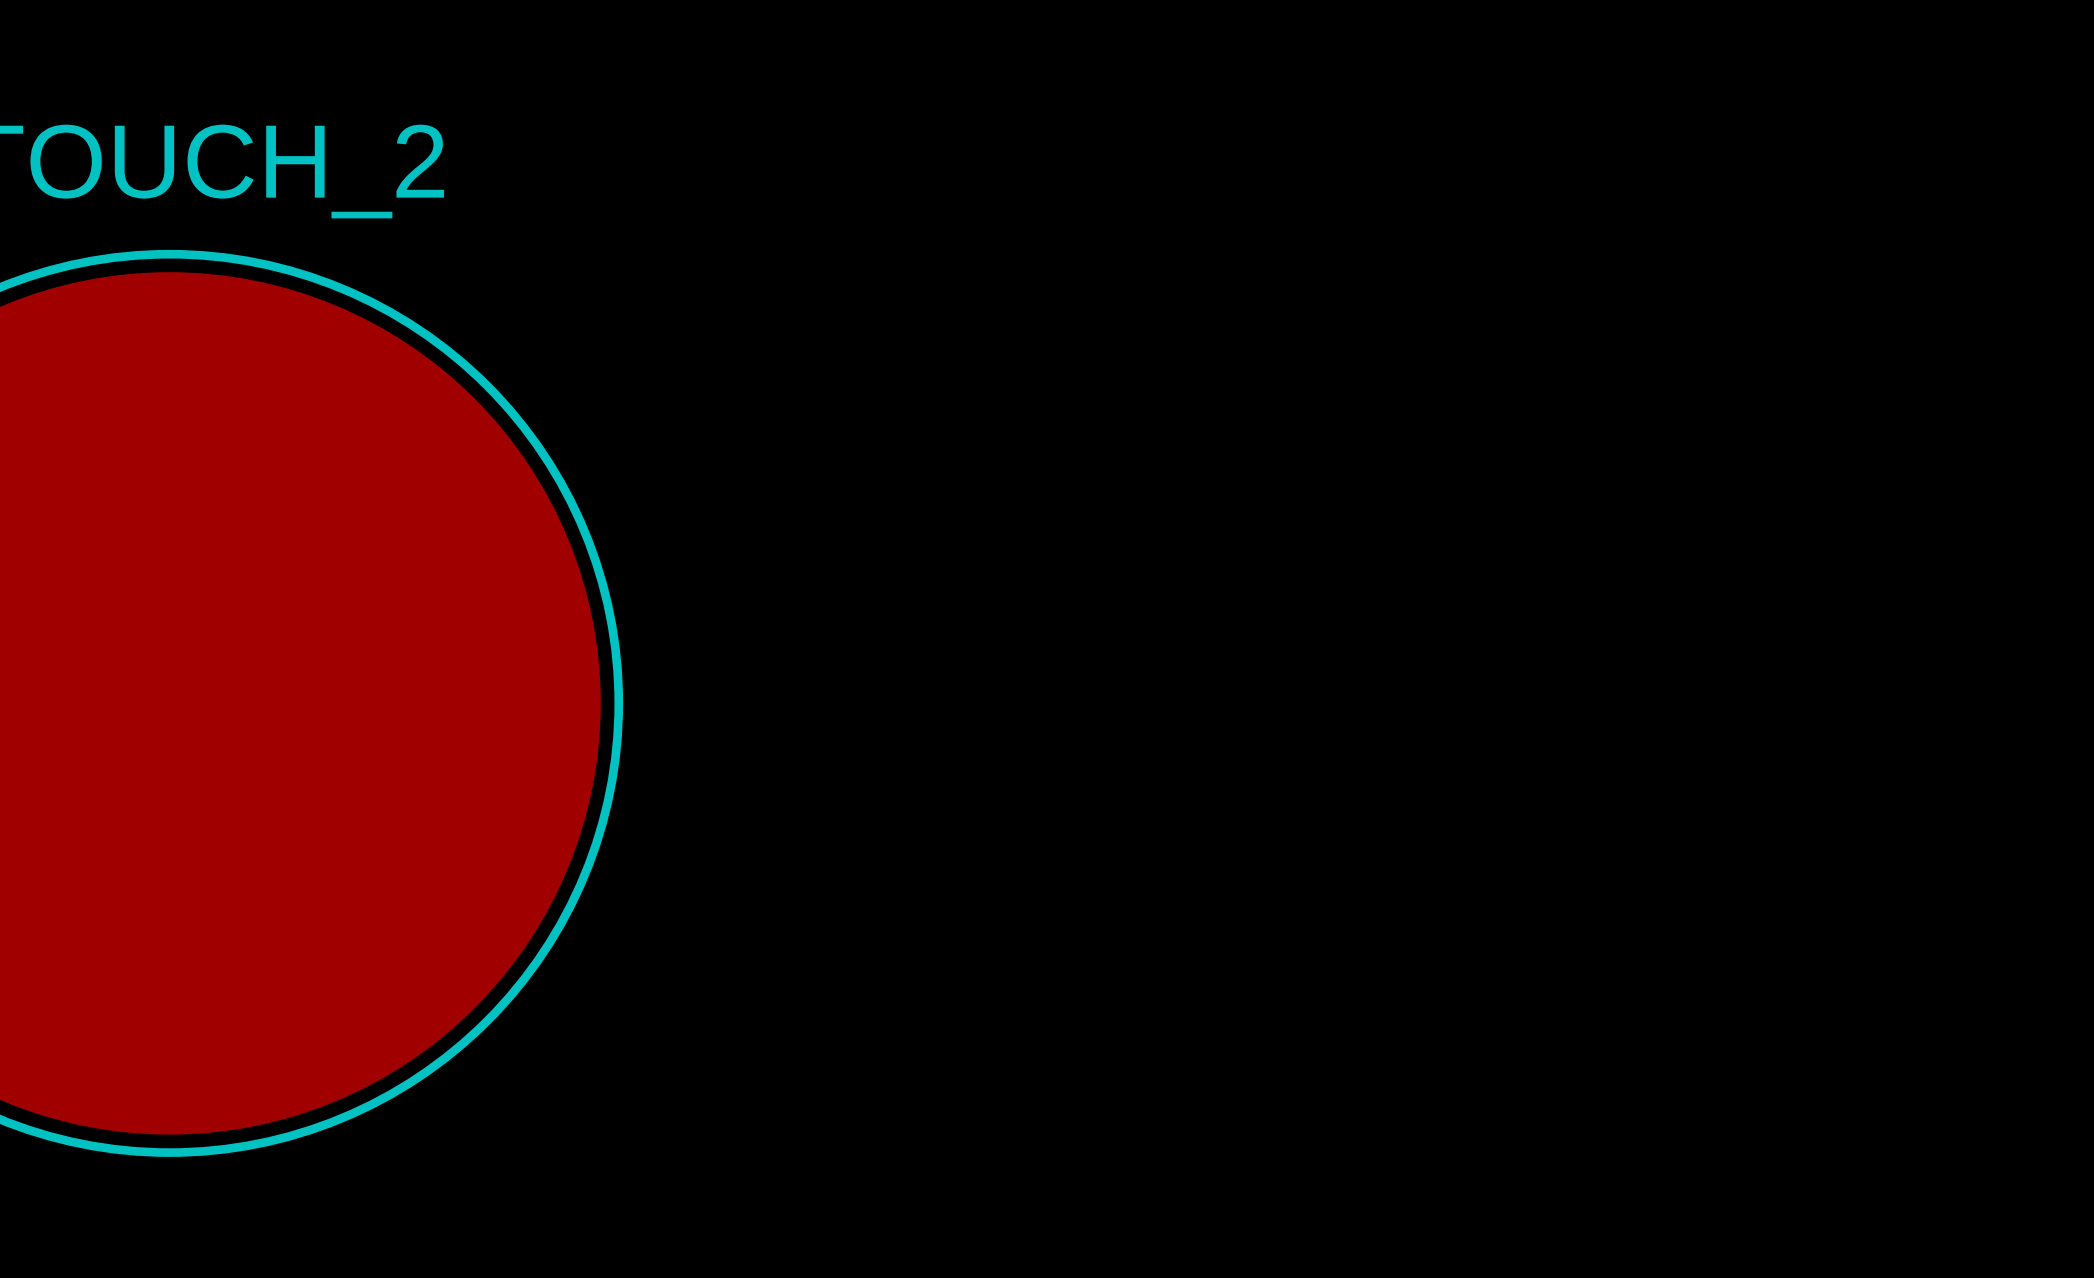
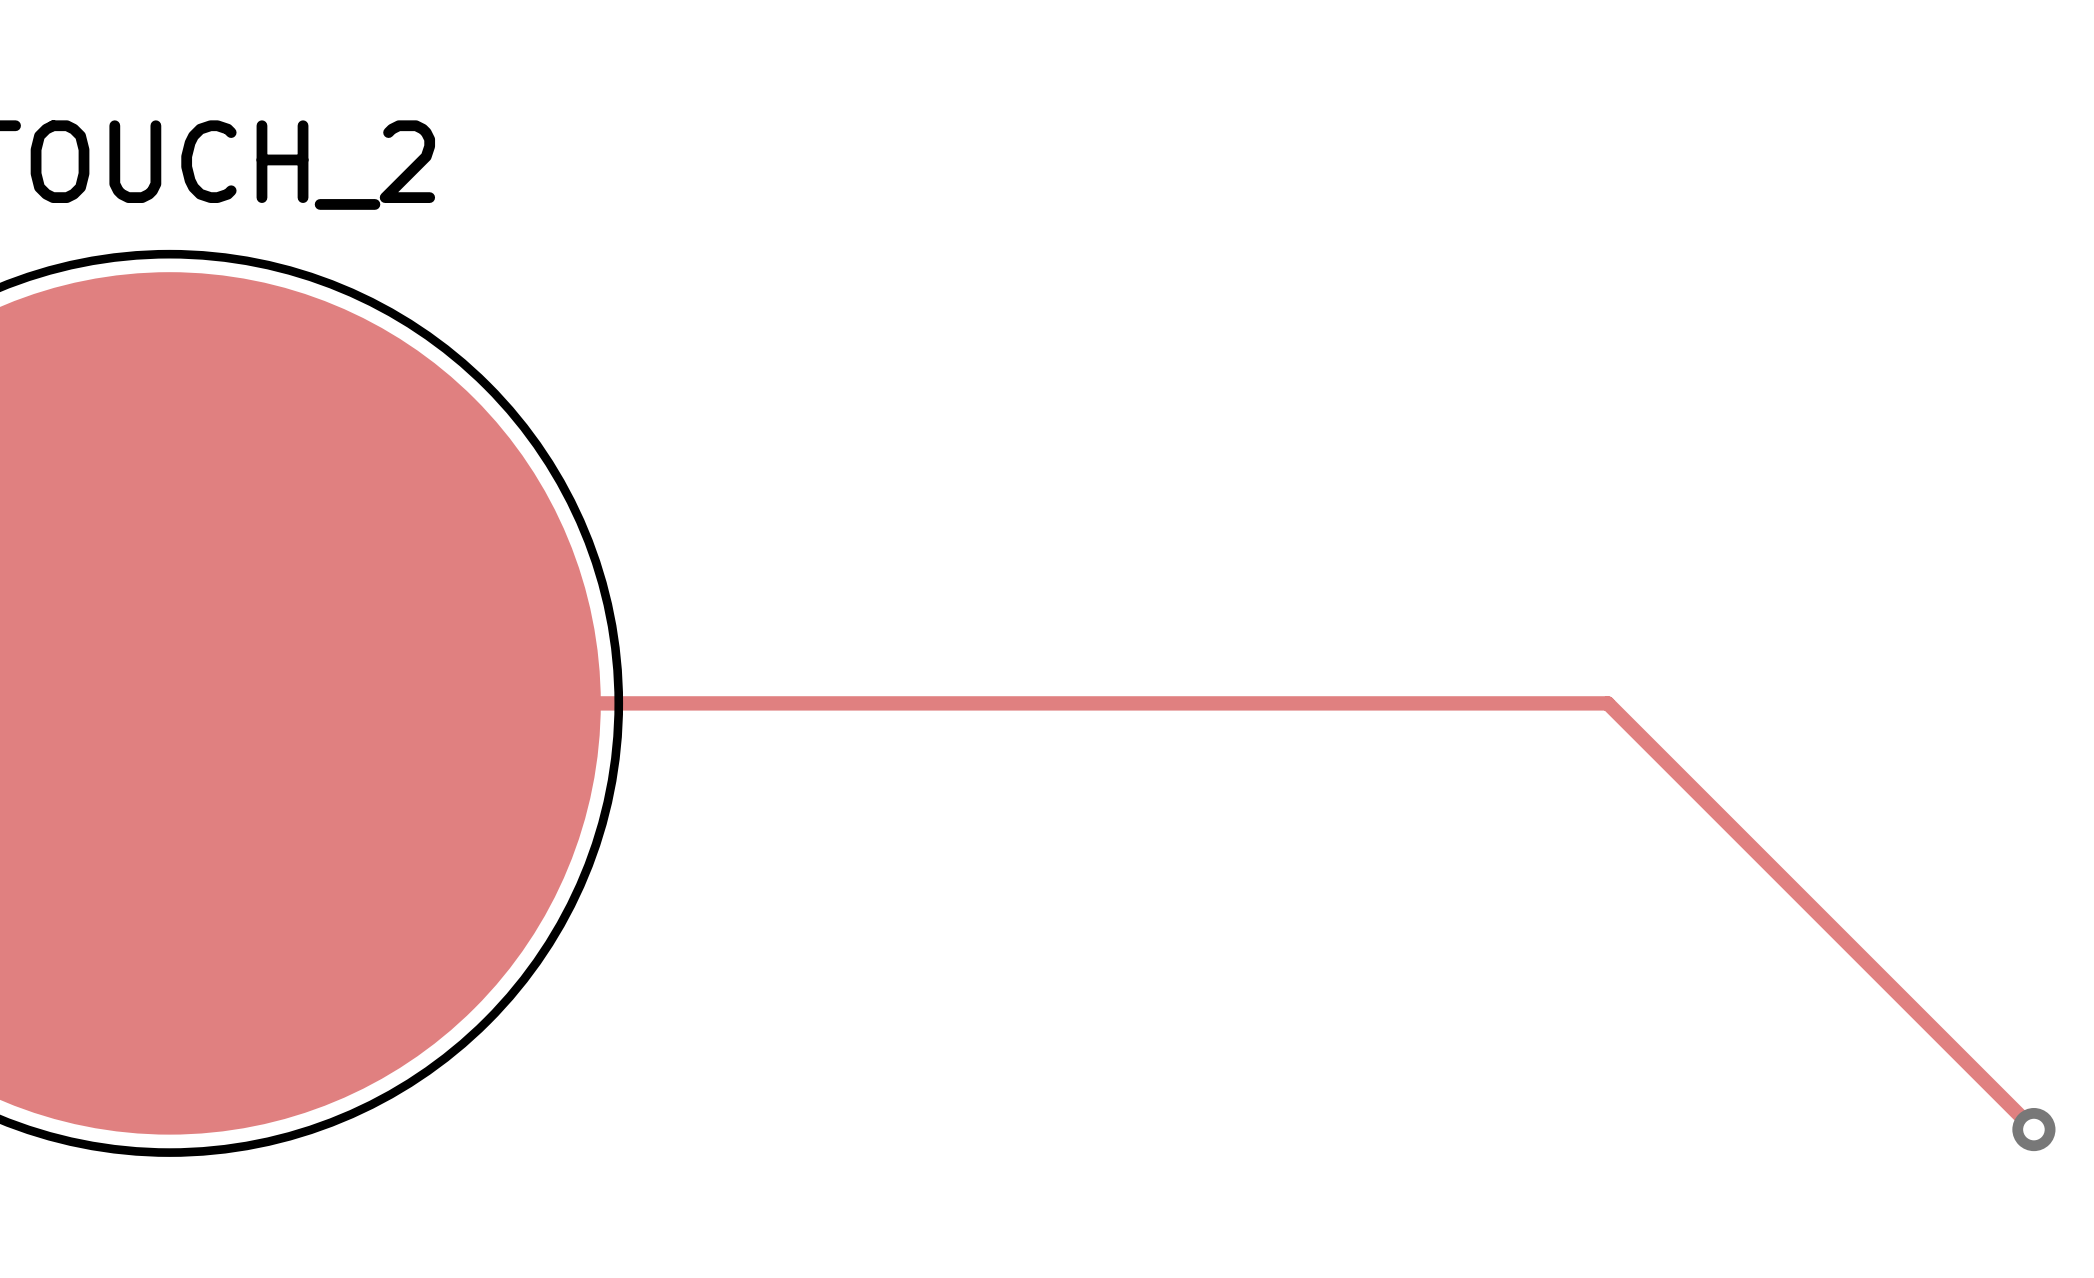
track: none -> (169, 703) (1607, 703) (2033, 1129)
via: none -> (2033, 1129)

